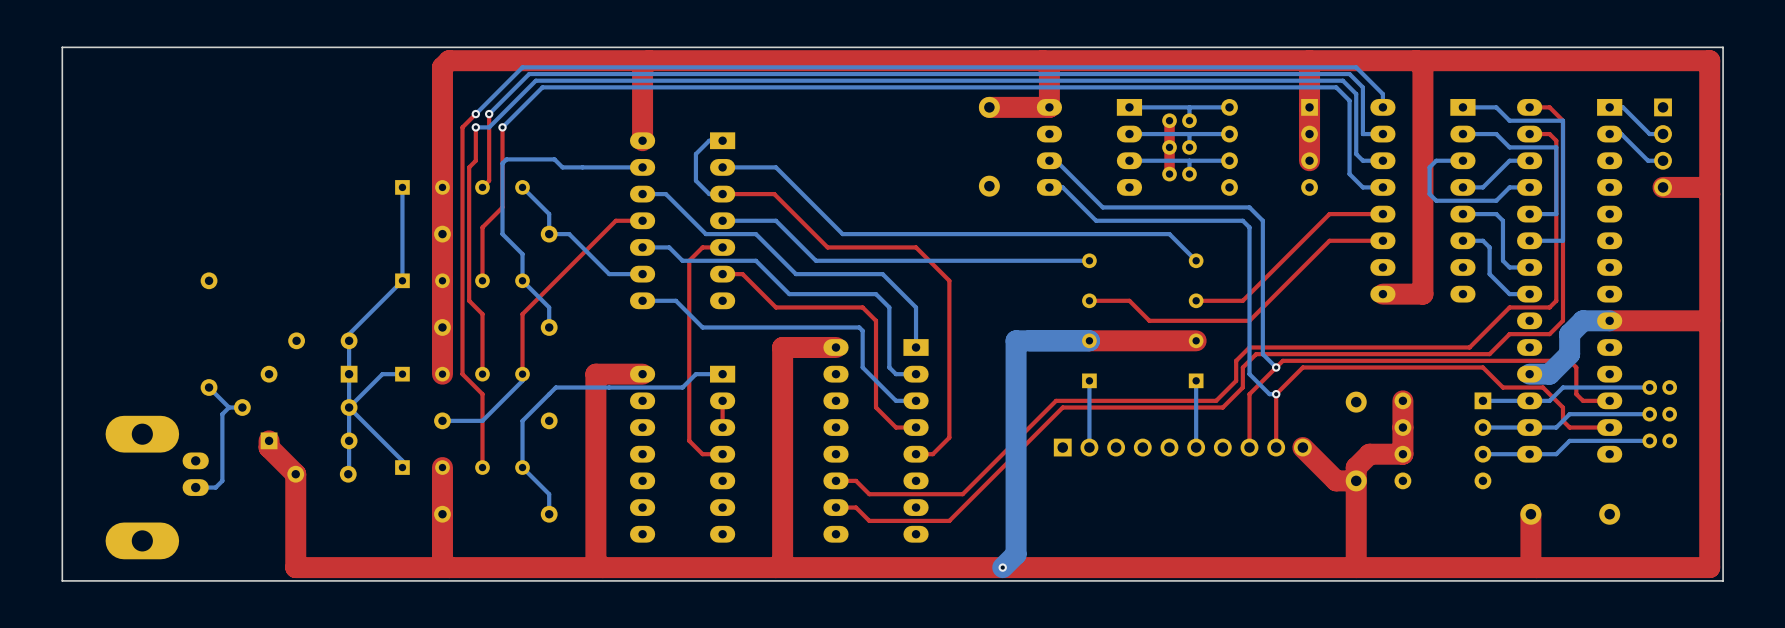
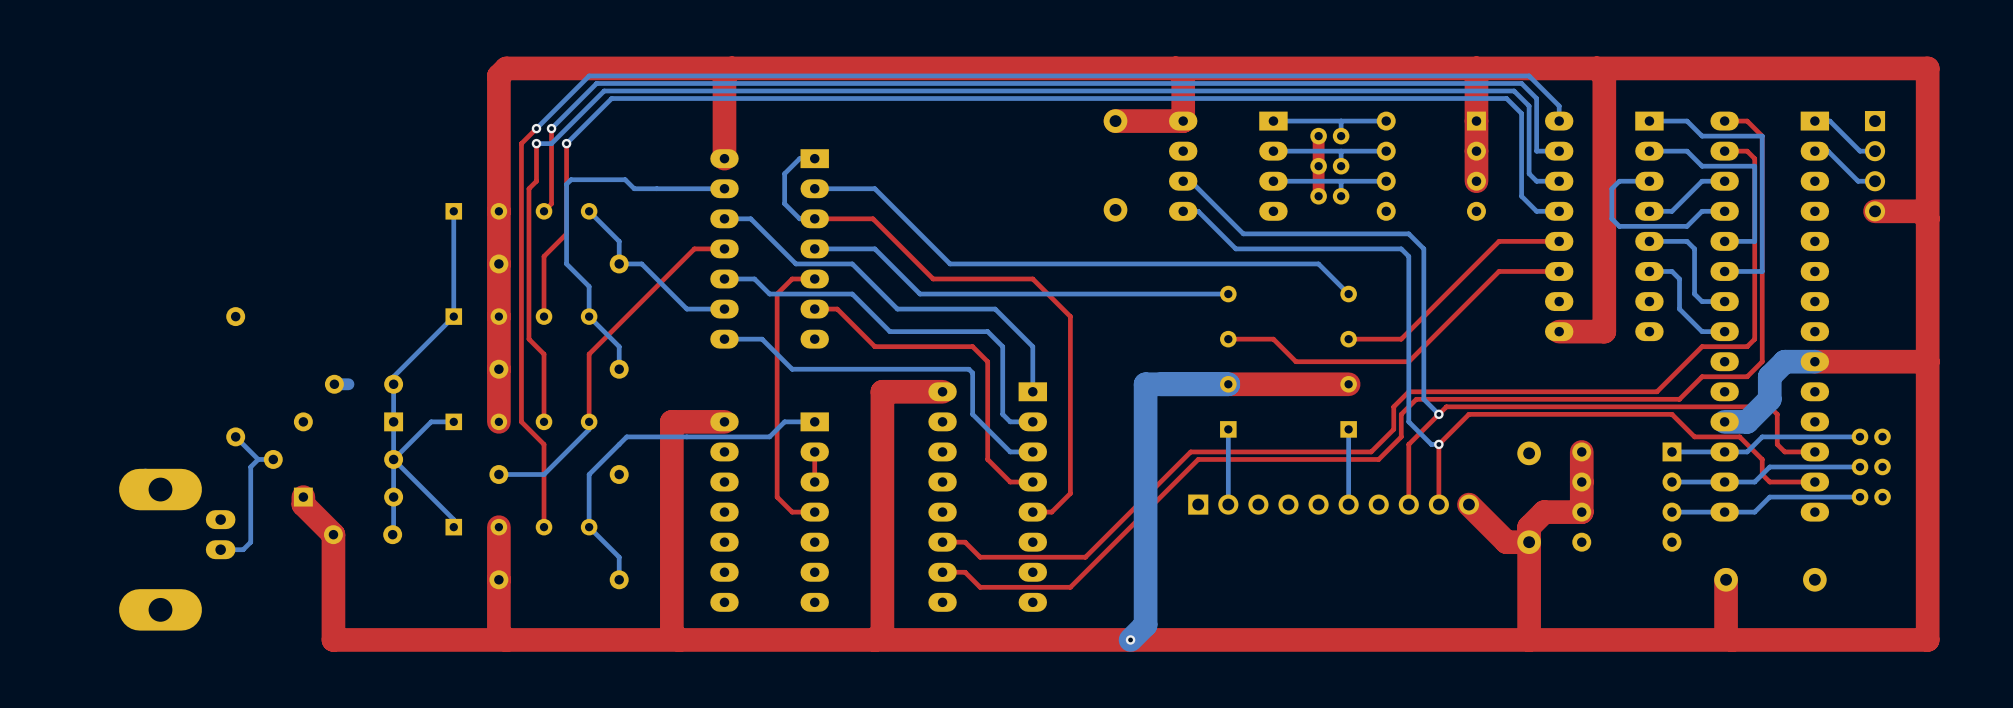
board edge: (1723, 47) (1723, 580) (62, 580) (62, 47) (1723, 47) -> none
bottom track: none -> (348, 384) (334, 384)

